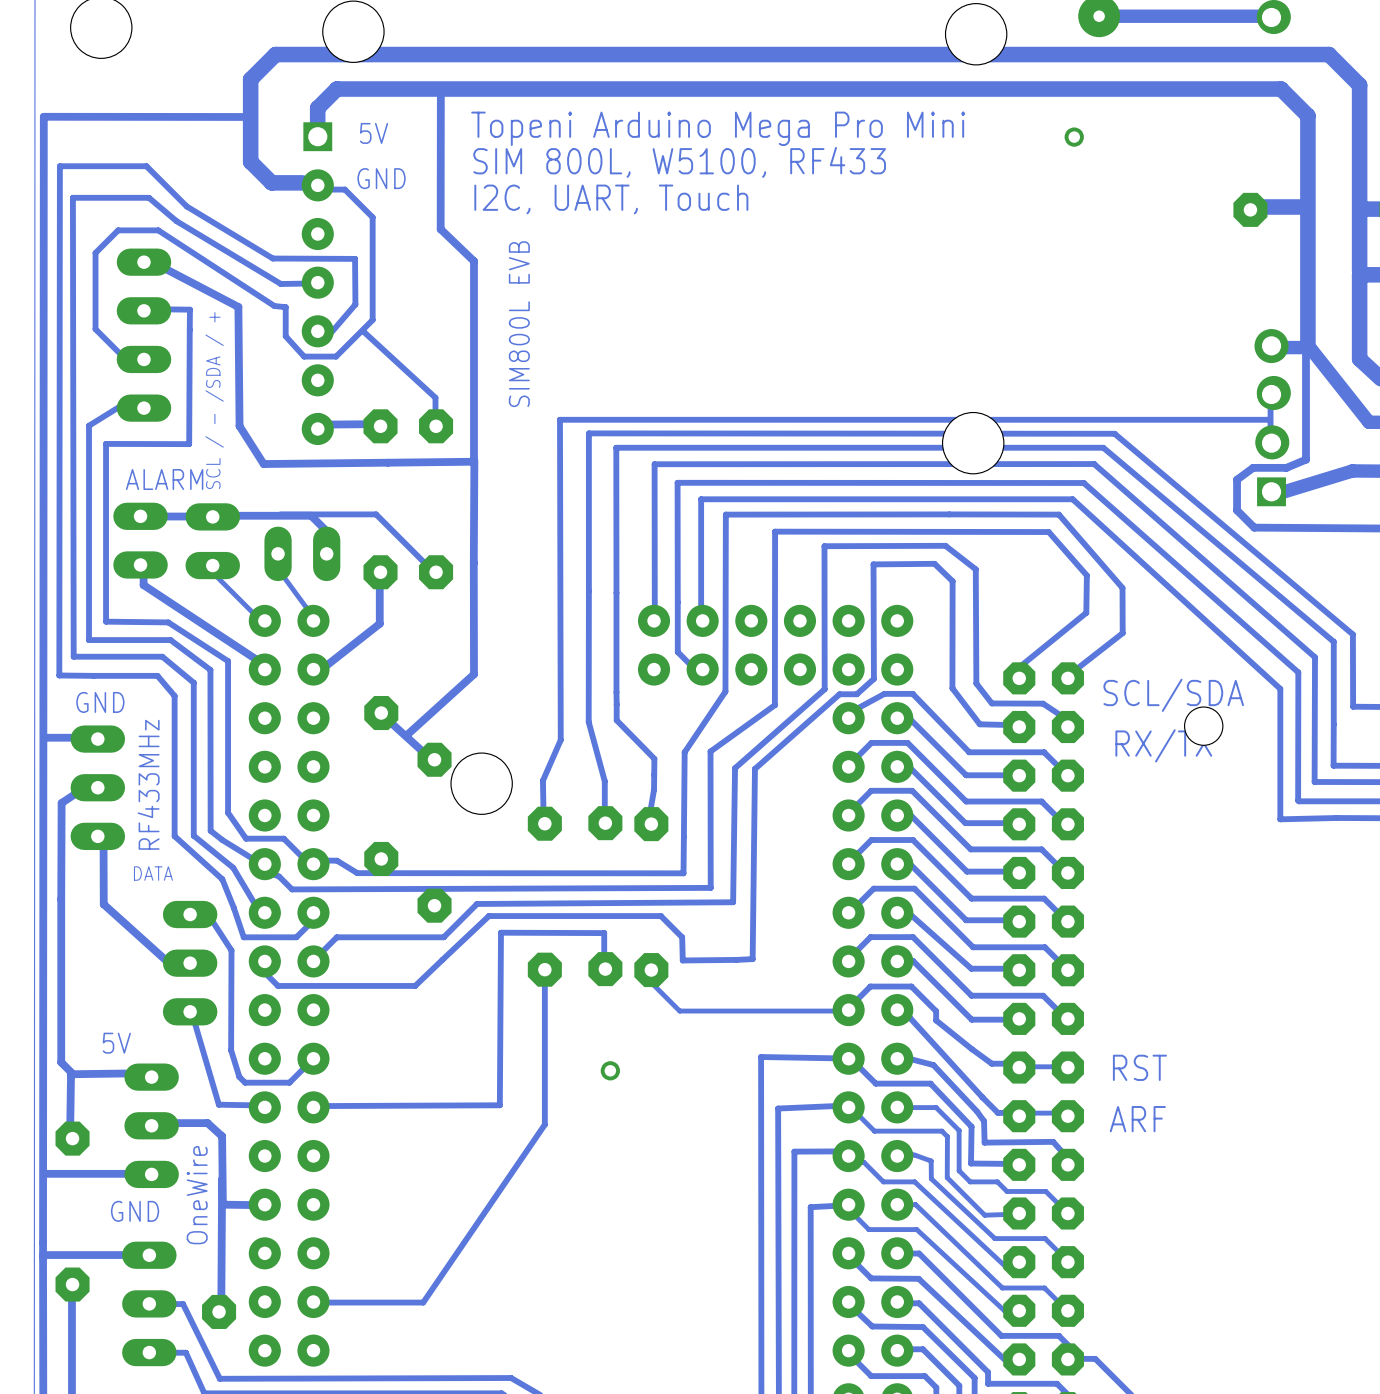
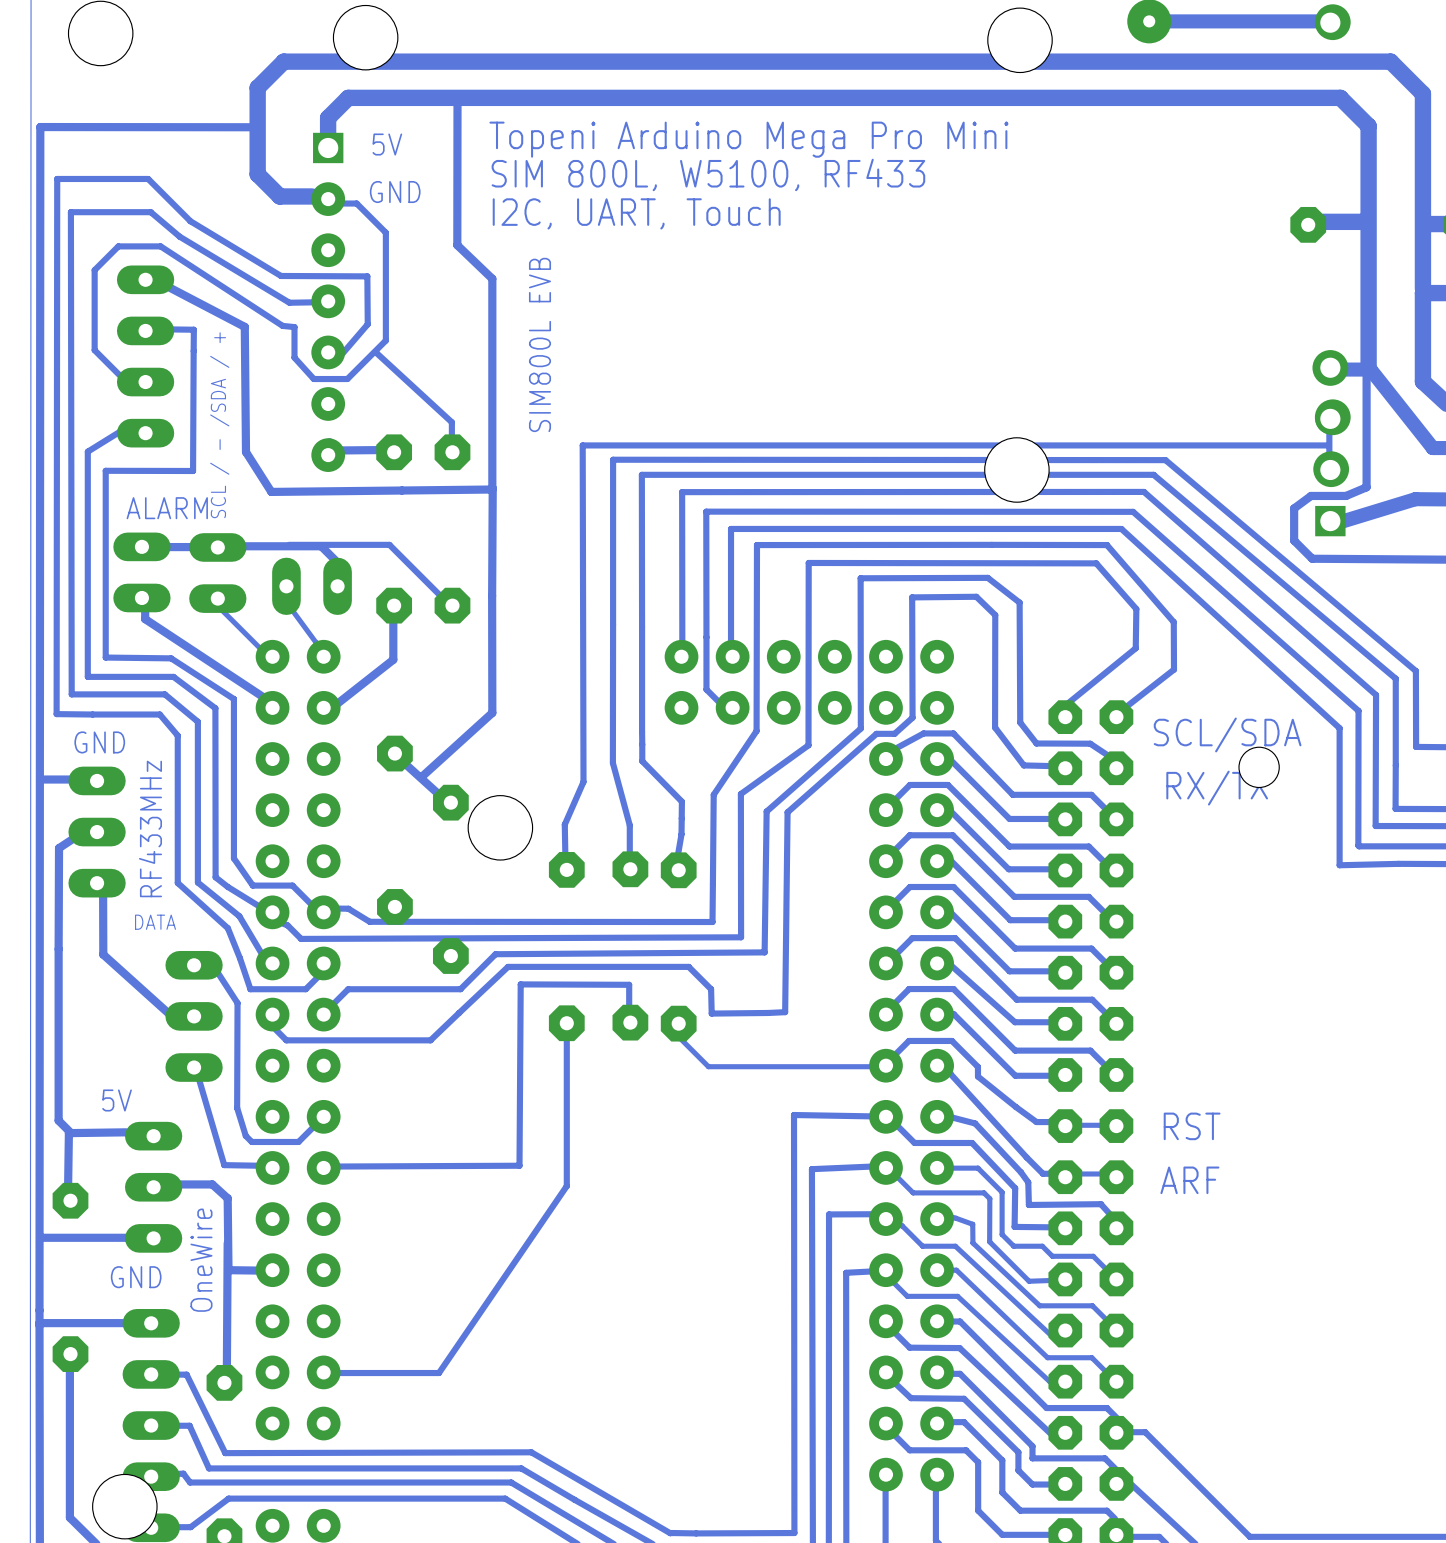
via: (1074, 137) -> none
via: (610, 1070) -> none

